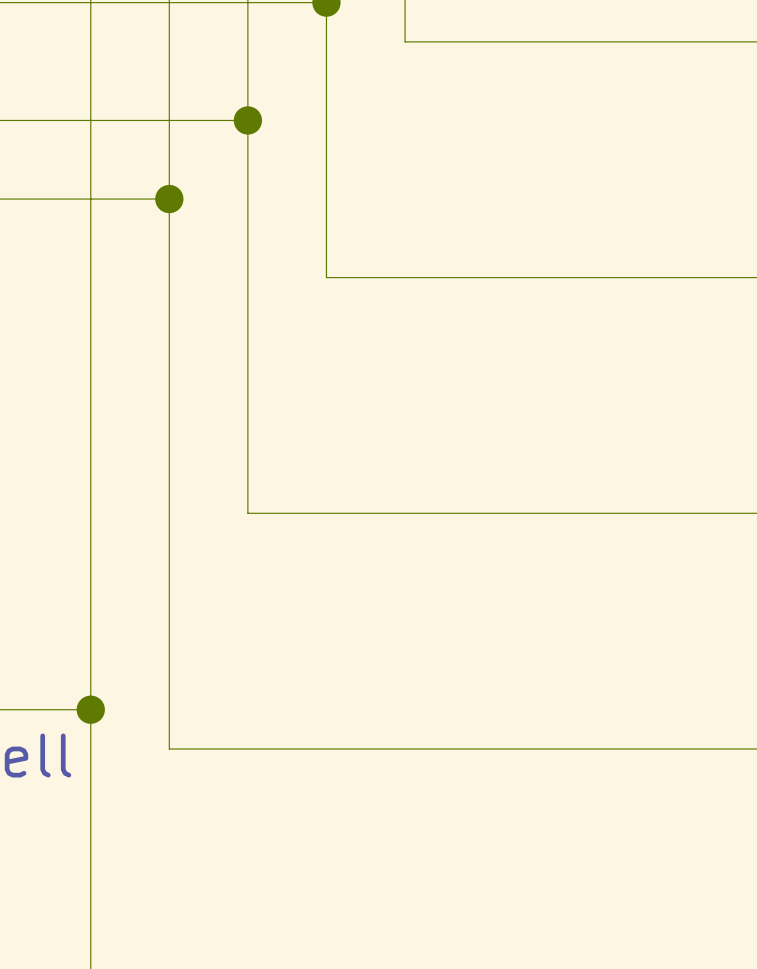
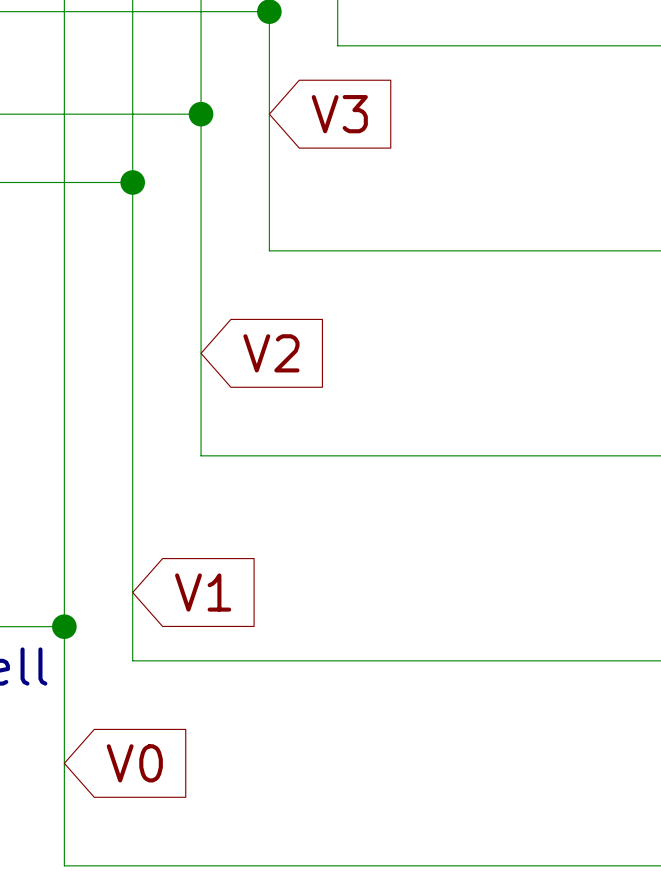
global label: none -> V3 (339, 114)
global label: none -> V2 (271, 353)
global label: none -> V1 (203, 592)
global label: none -> V0 (134, 763)

